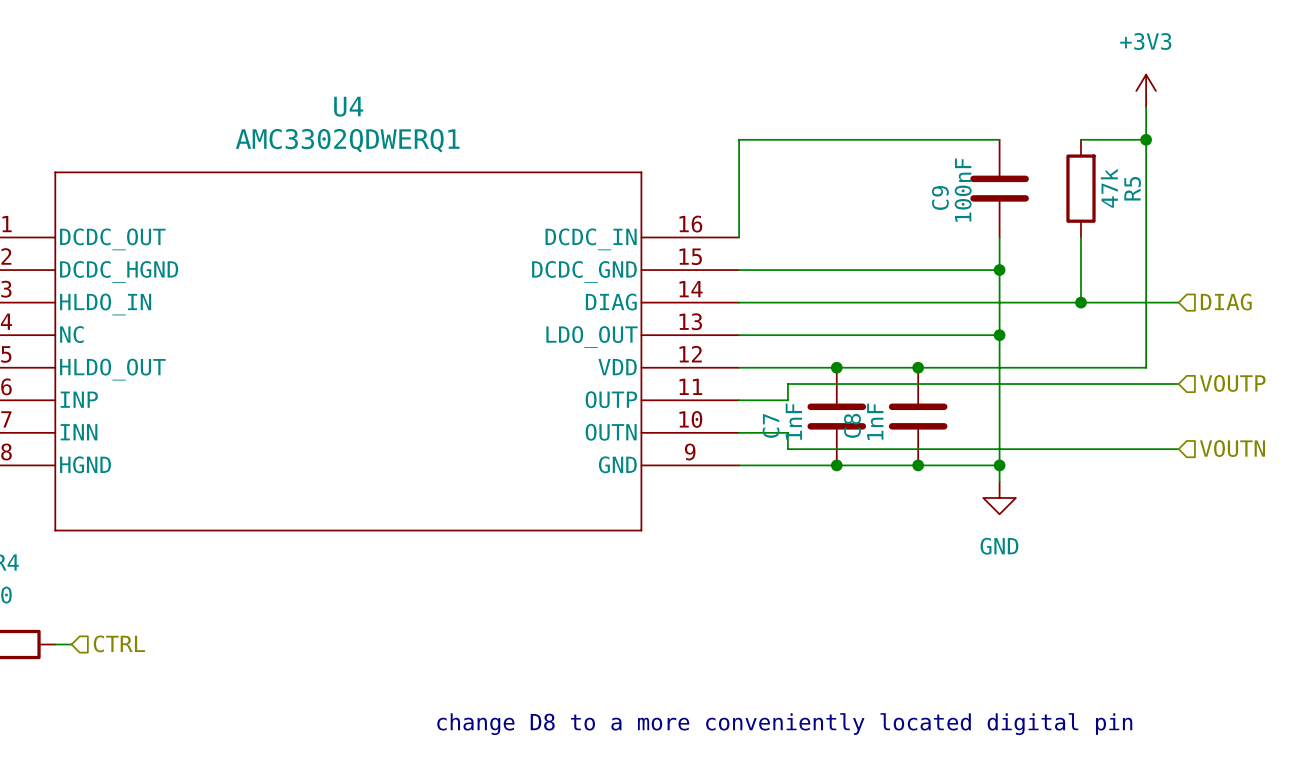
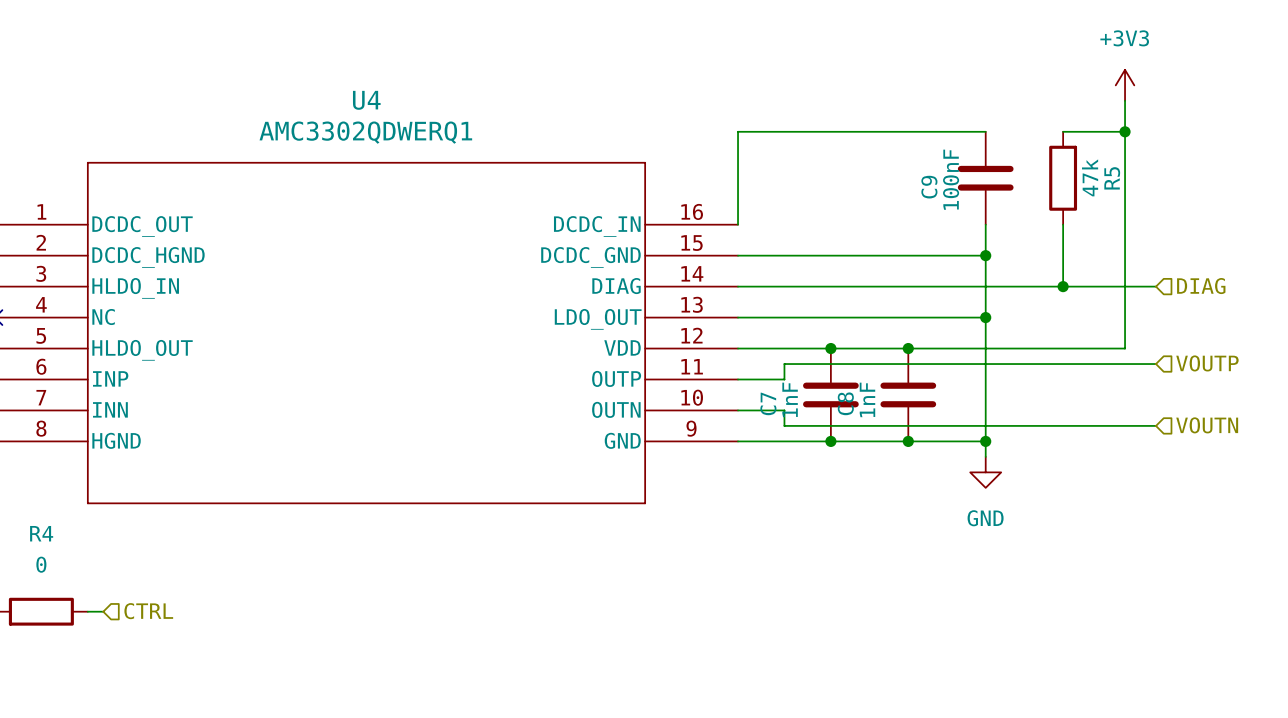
text: change D8 to a more conveniently located digital pin (784, 724) -> none

